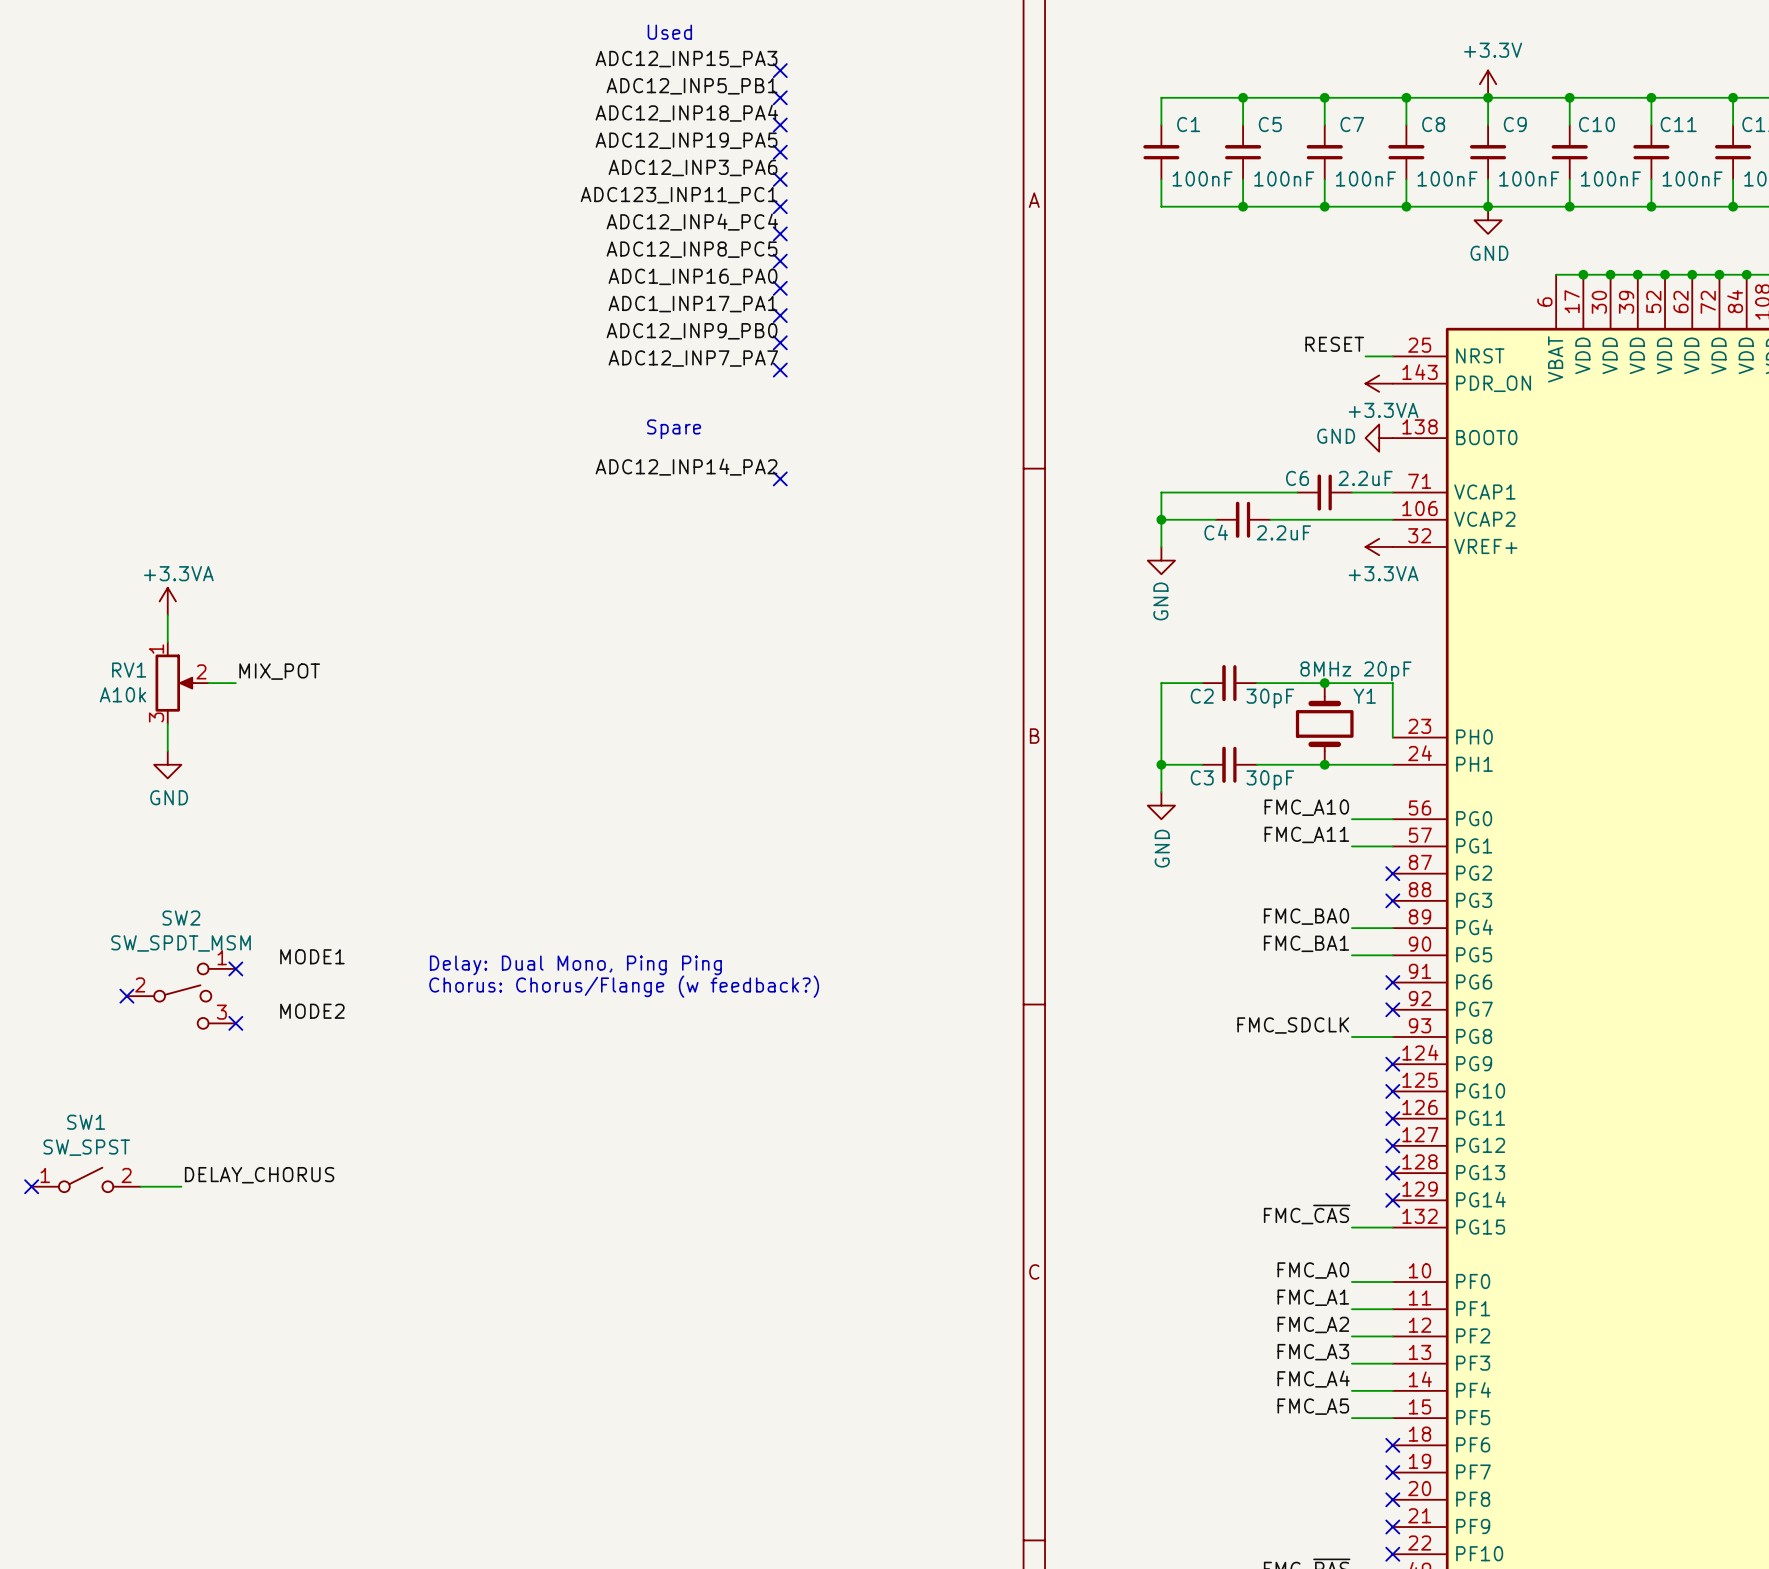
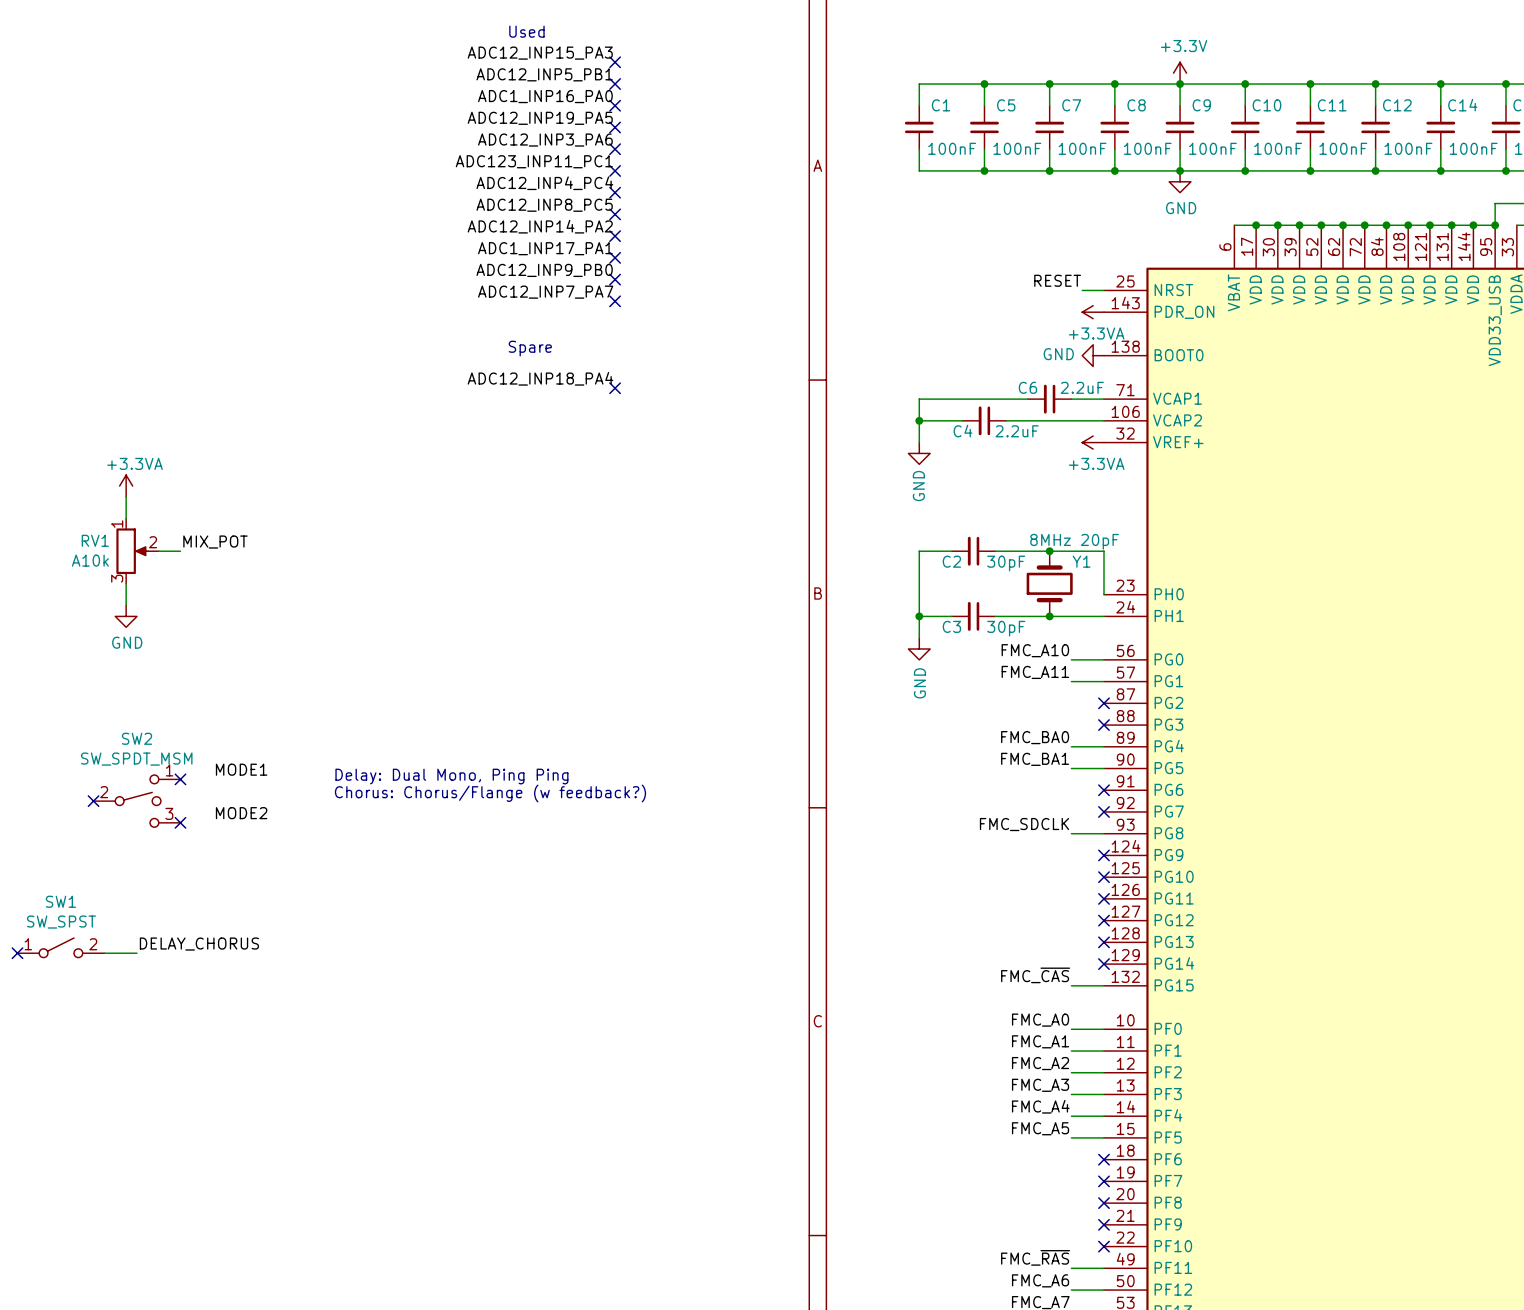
label: ADC12_INP18_PA4 (686, 113) -> ADC1_INP16_PA0 (545, 96)
label: ADC1_INP16_PA0 (692, 276) -> ADC12_INP14_PA2 (540, 226)
label: ADC12_INP14_PA2 (686, 467) -> ADC12_INP18_PA4 (540, 378)

